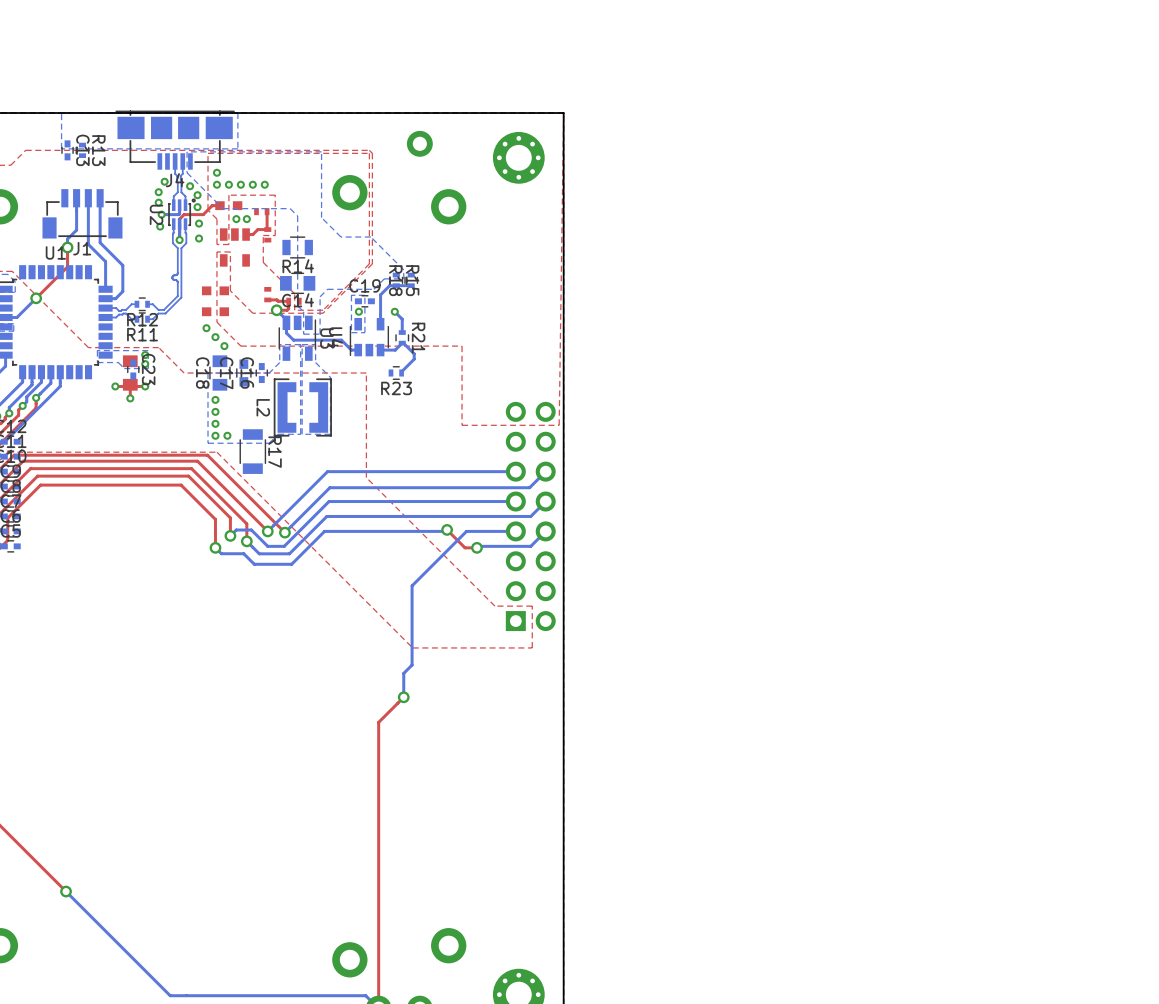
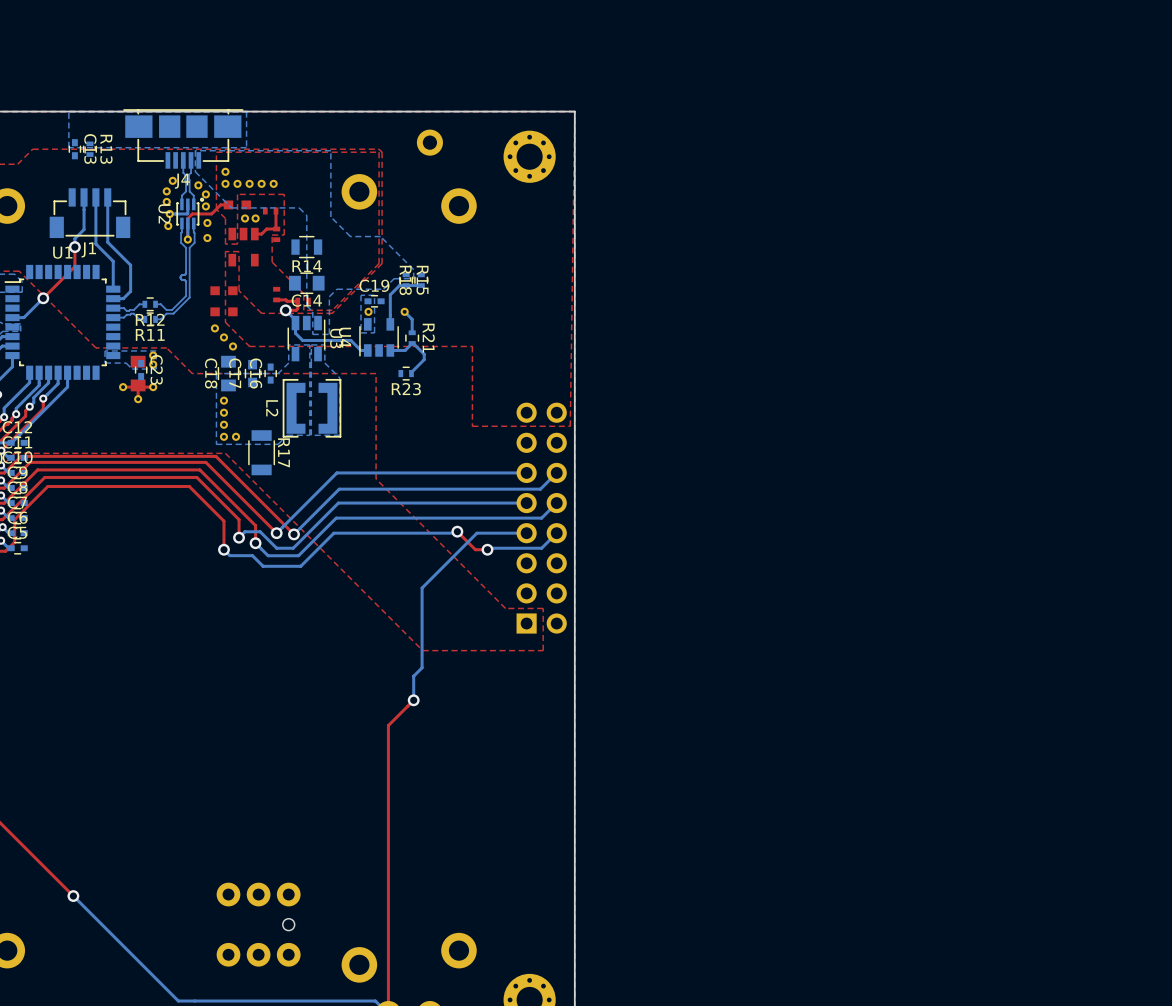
part: none -> (258, 924)

